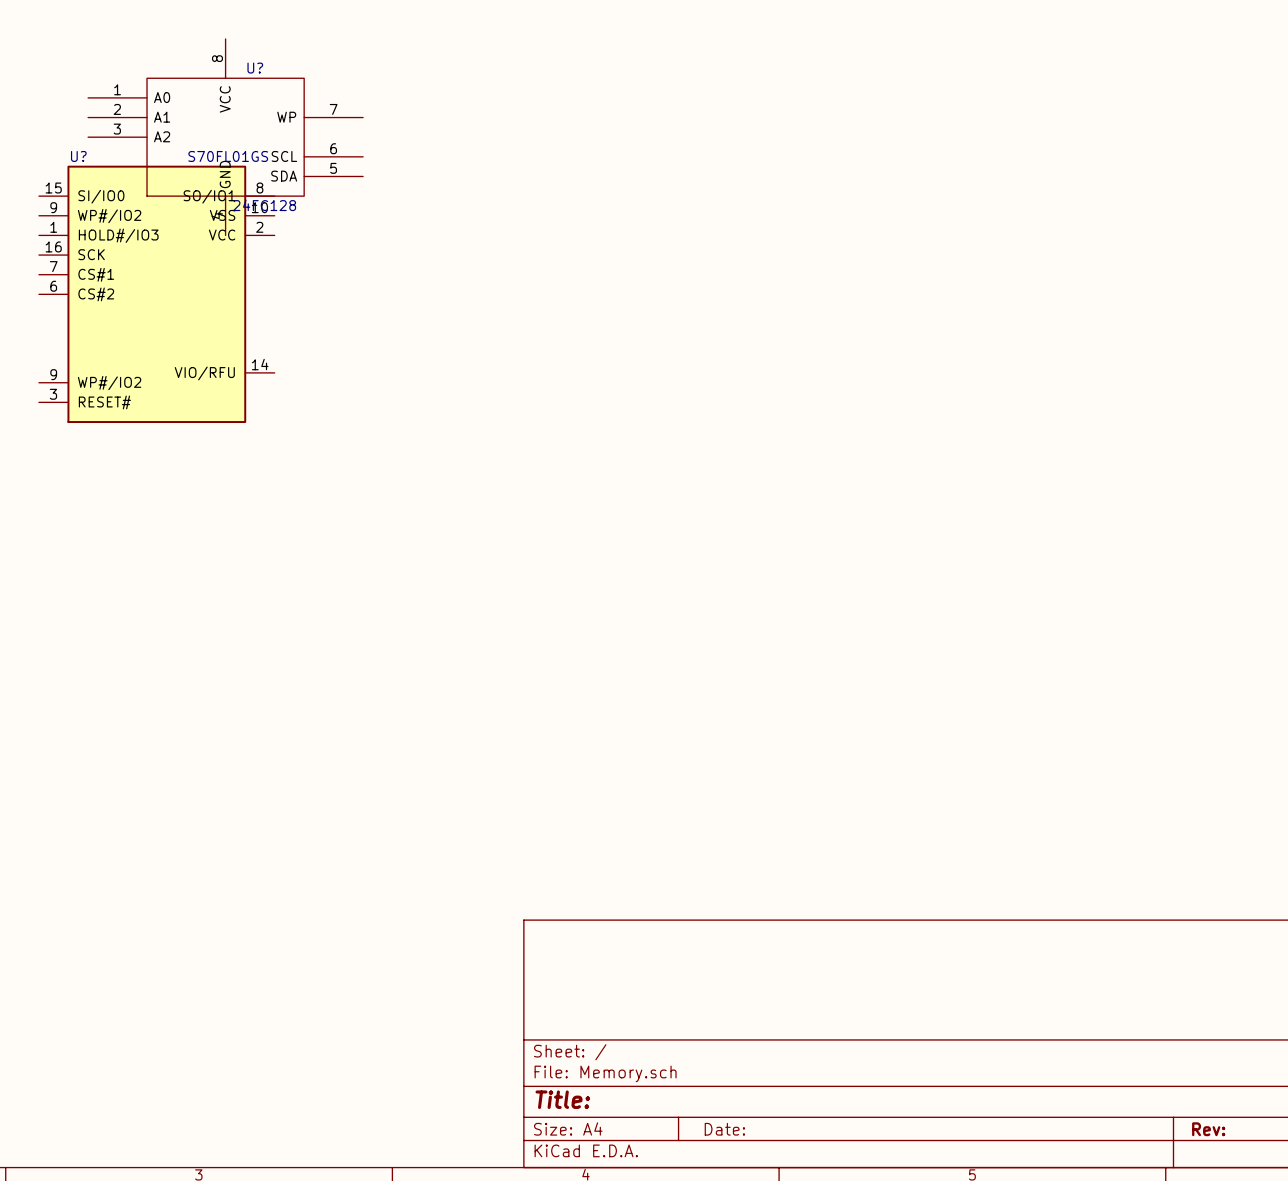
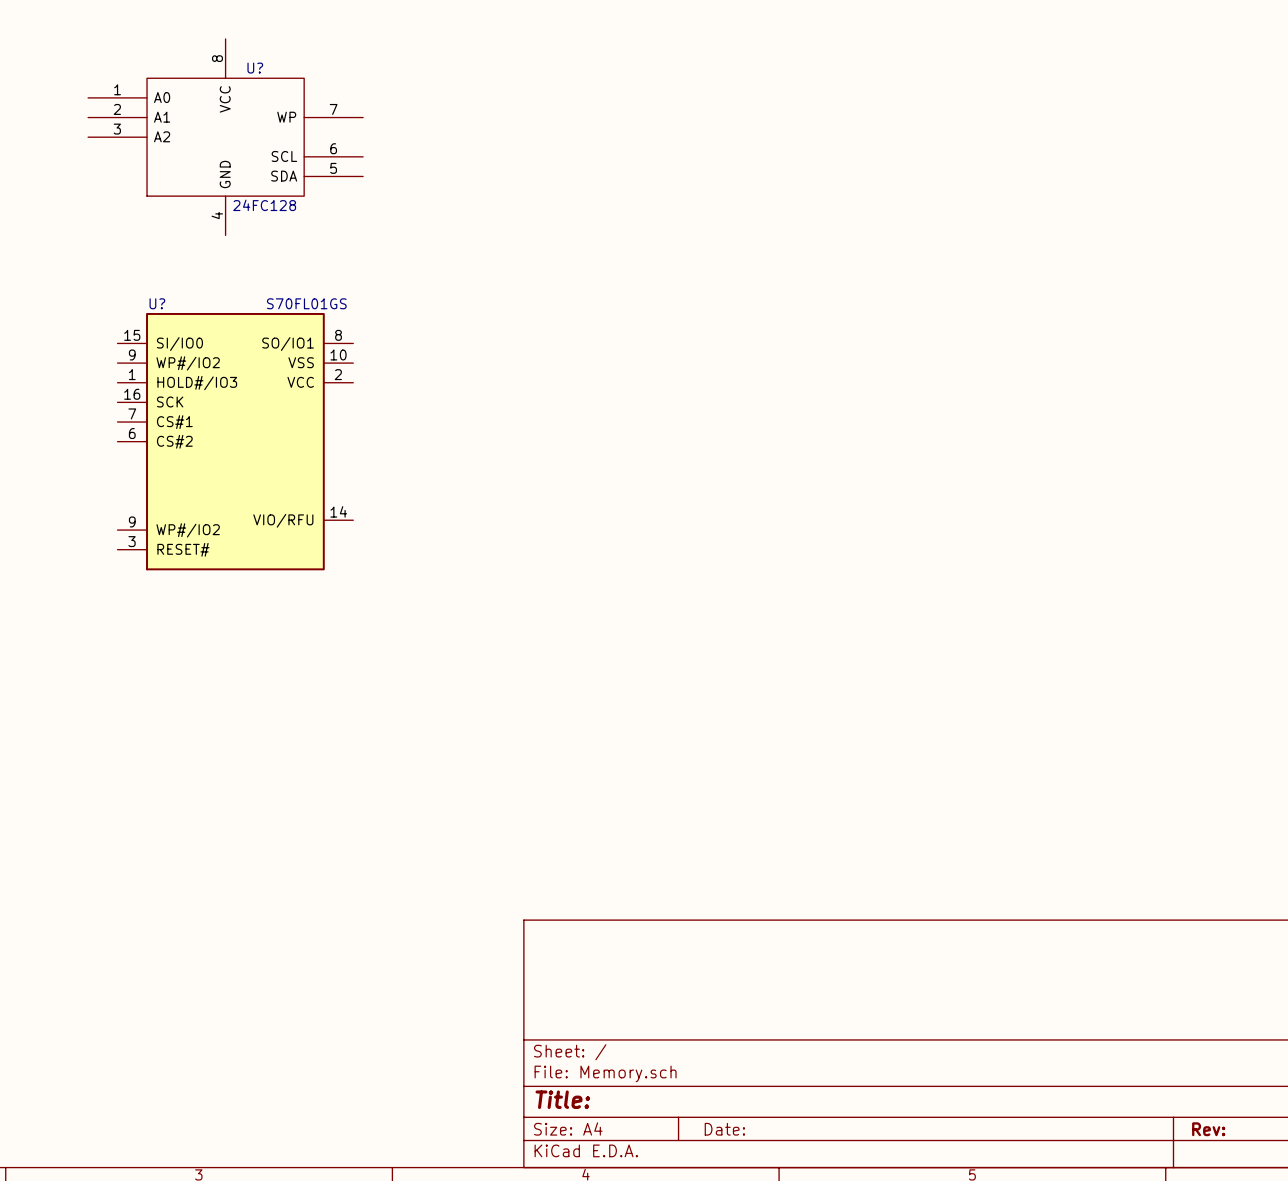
U? position: (156, 294) -> (235, 441)

